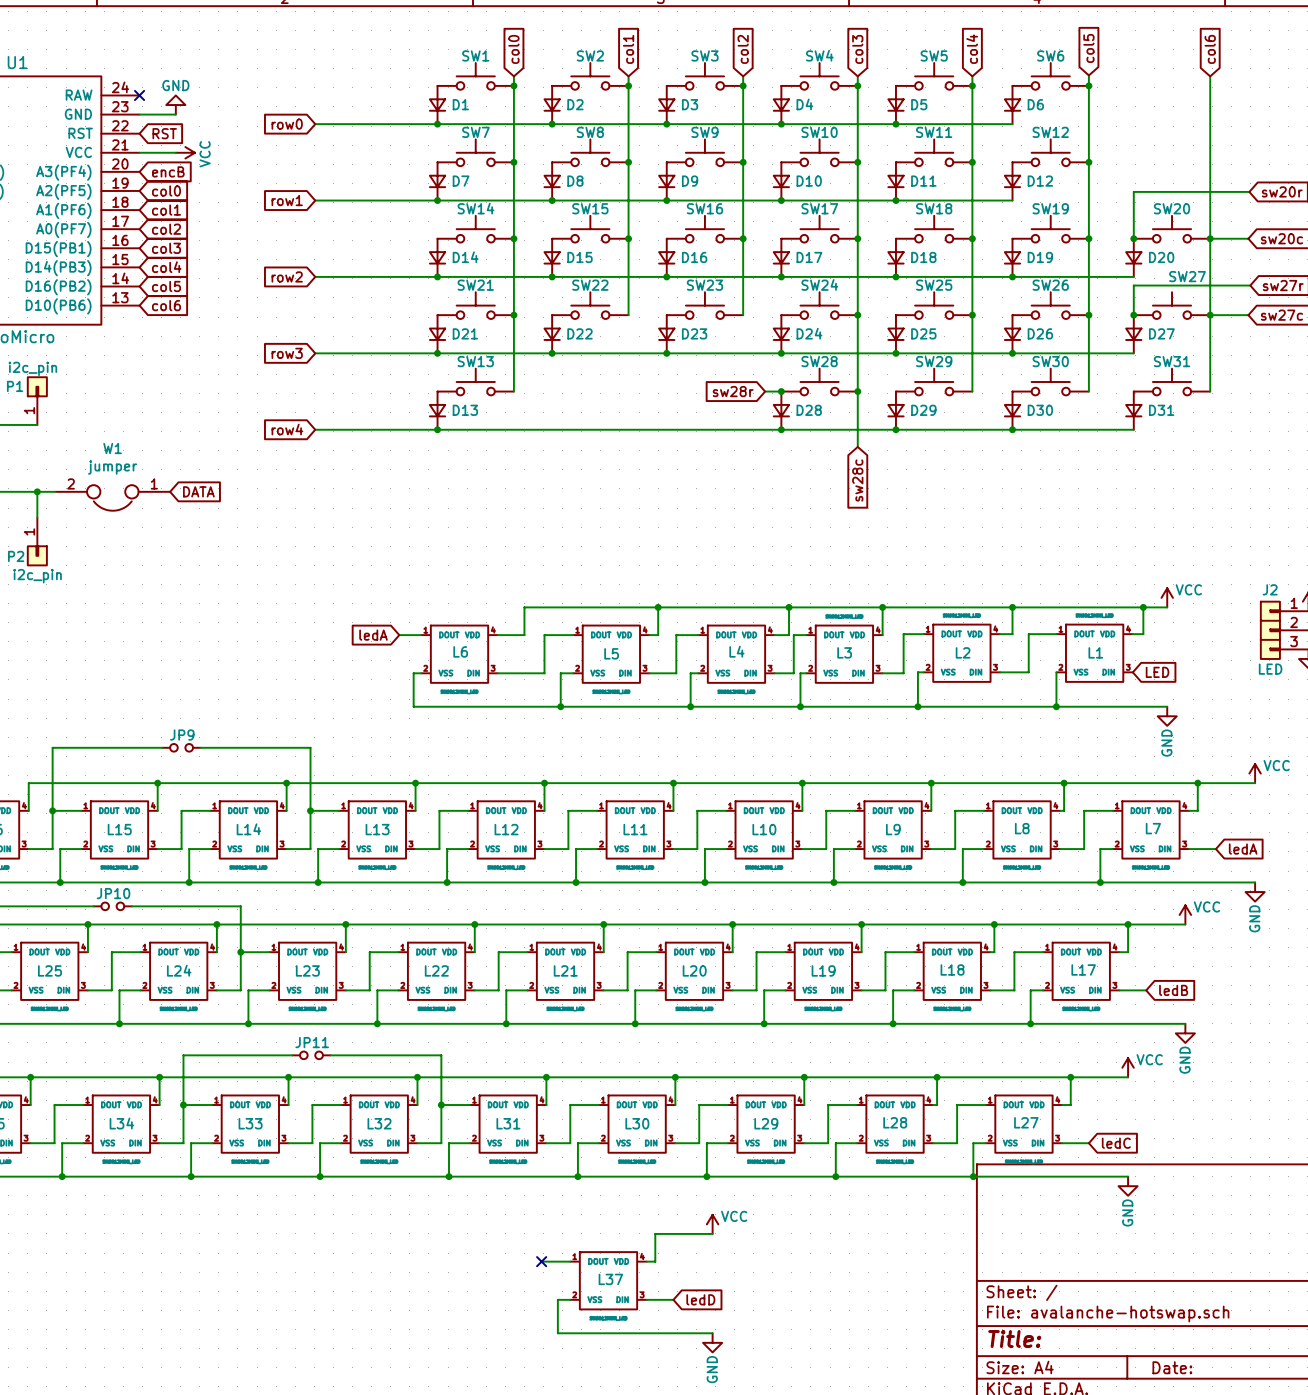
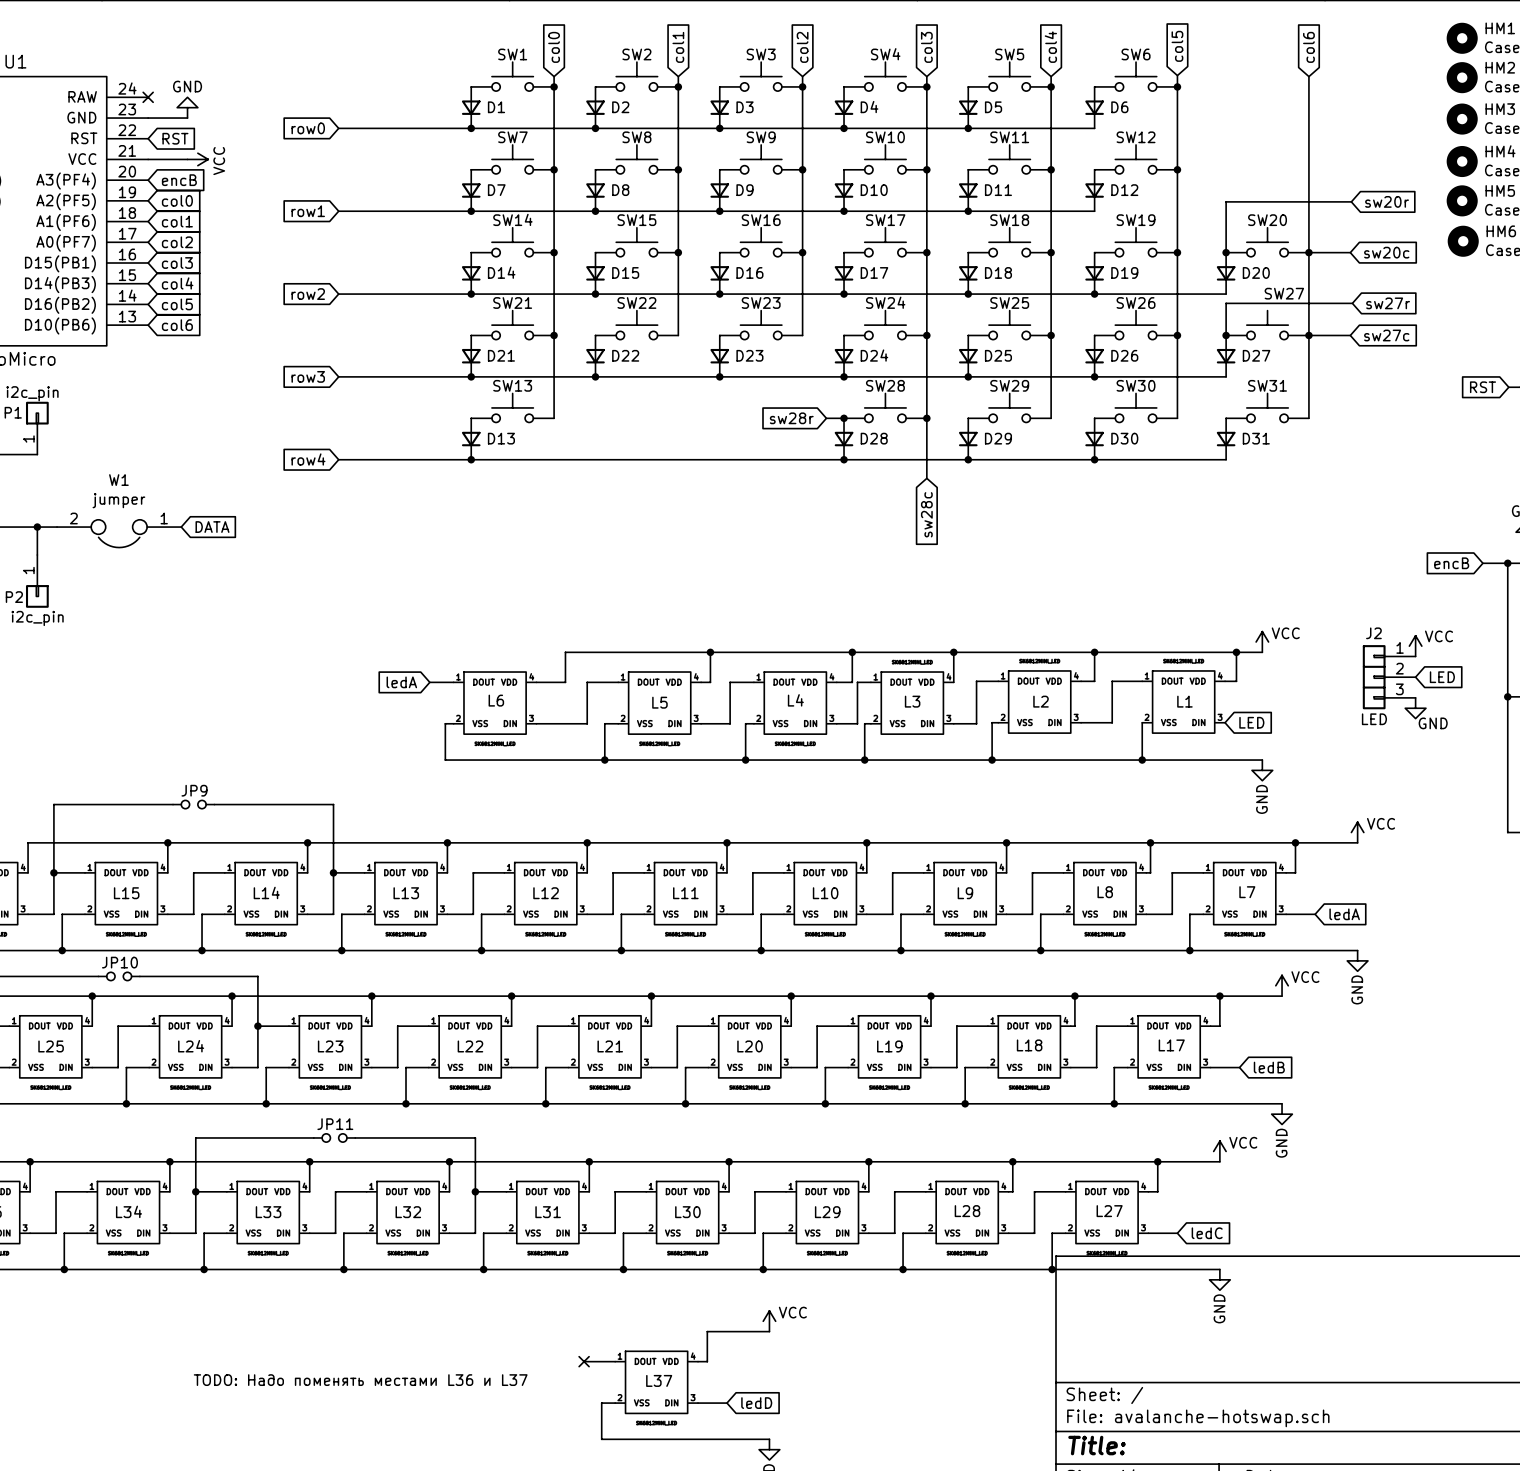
text: none -> TODO: Надо поменять местами L36 и L37 (360, 1380)

